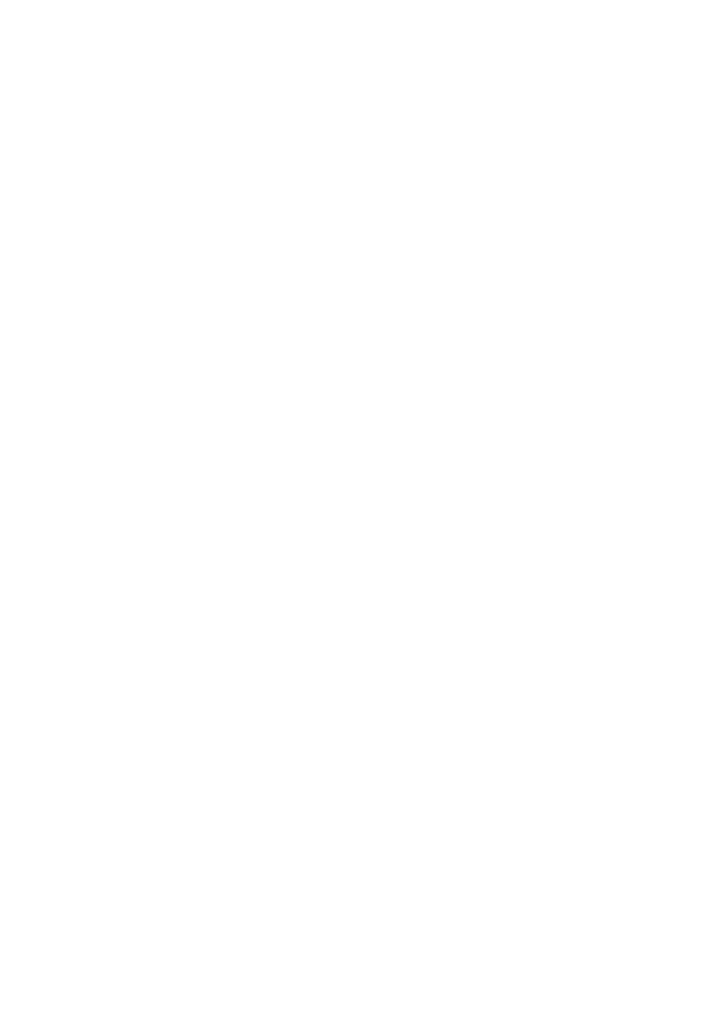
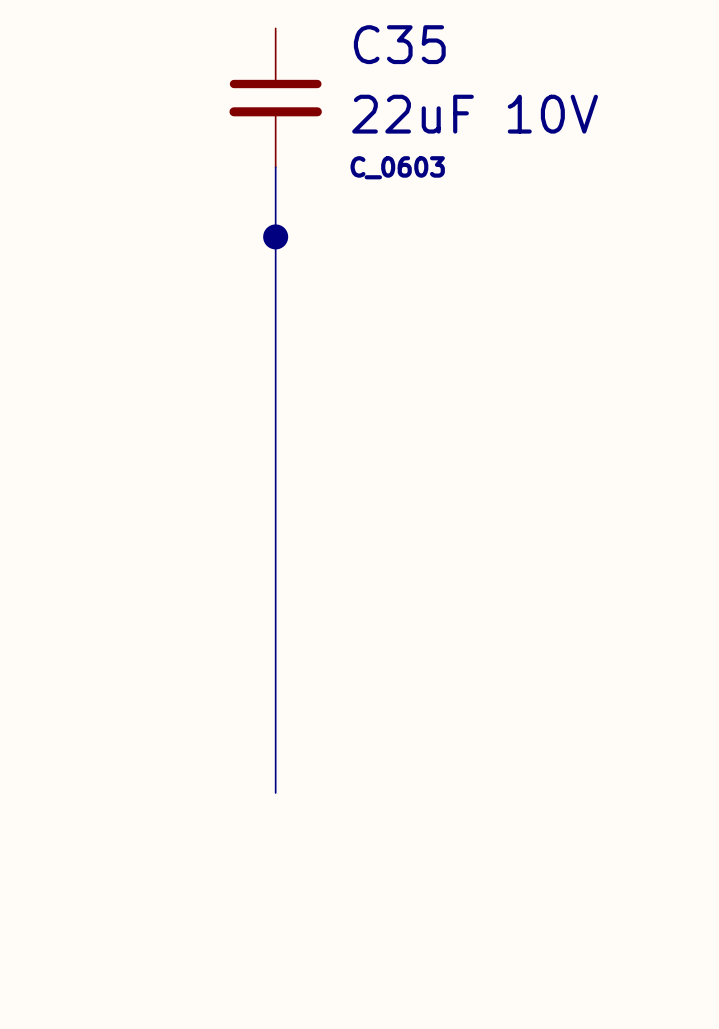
C35: none -> 22uF 10V (275, 97)
wire: none -> (275, 167) (275, 792)
junction: none -> (275, 236)

